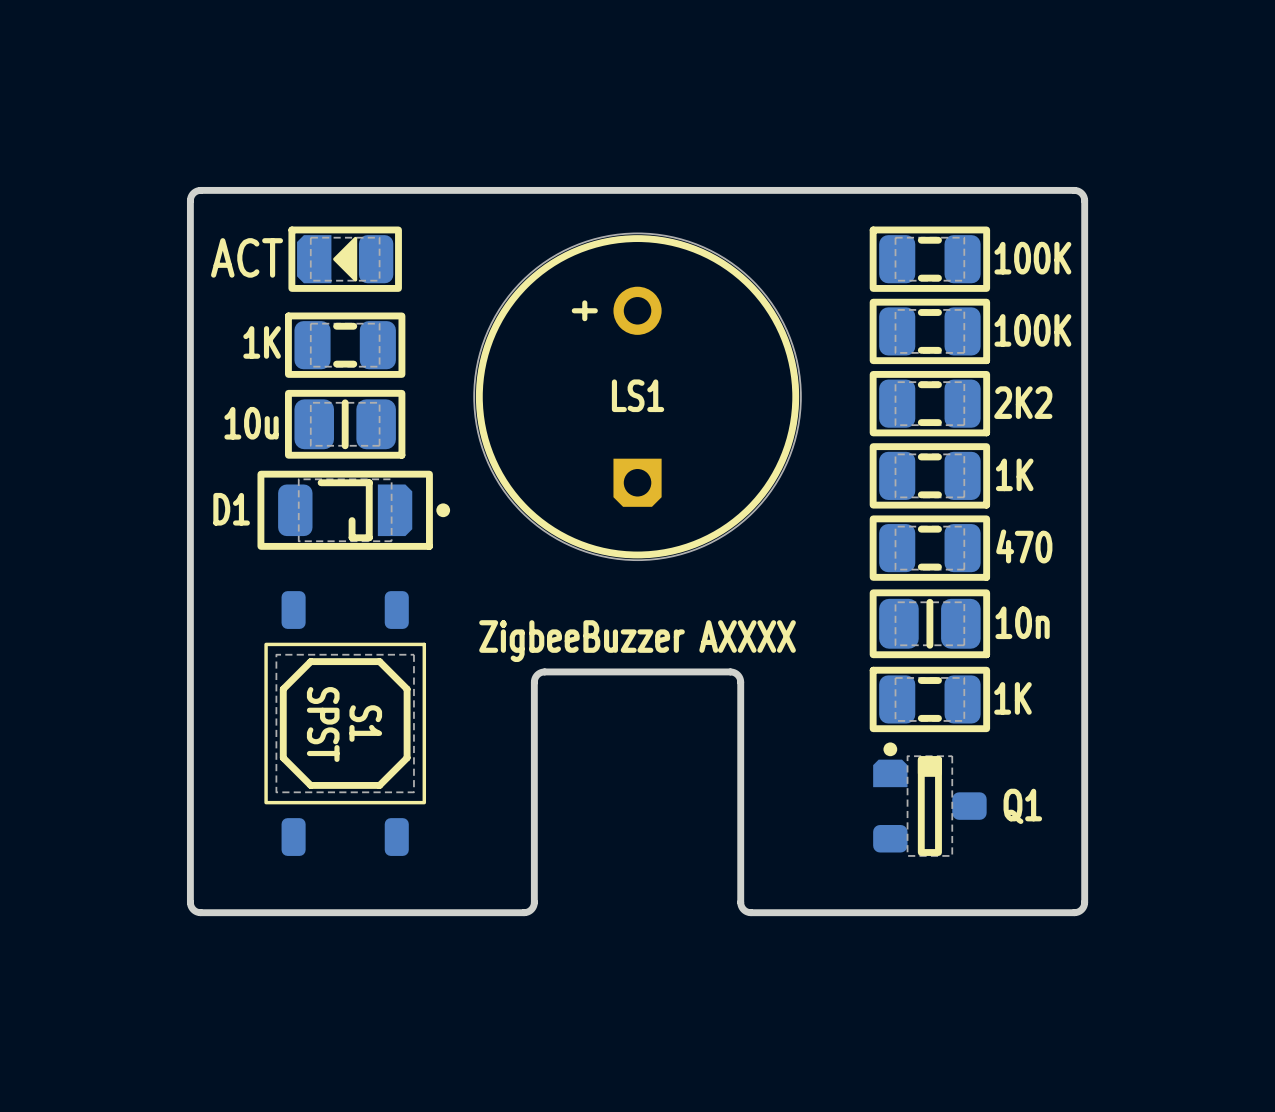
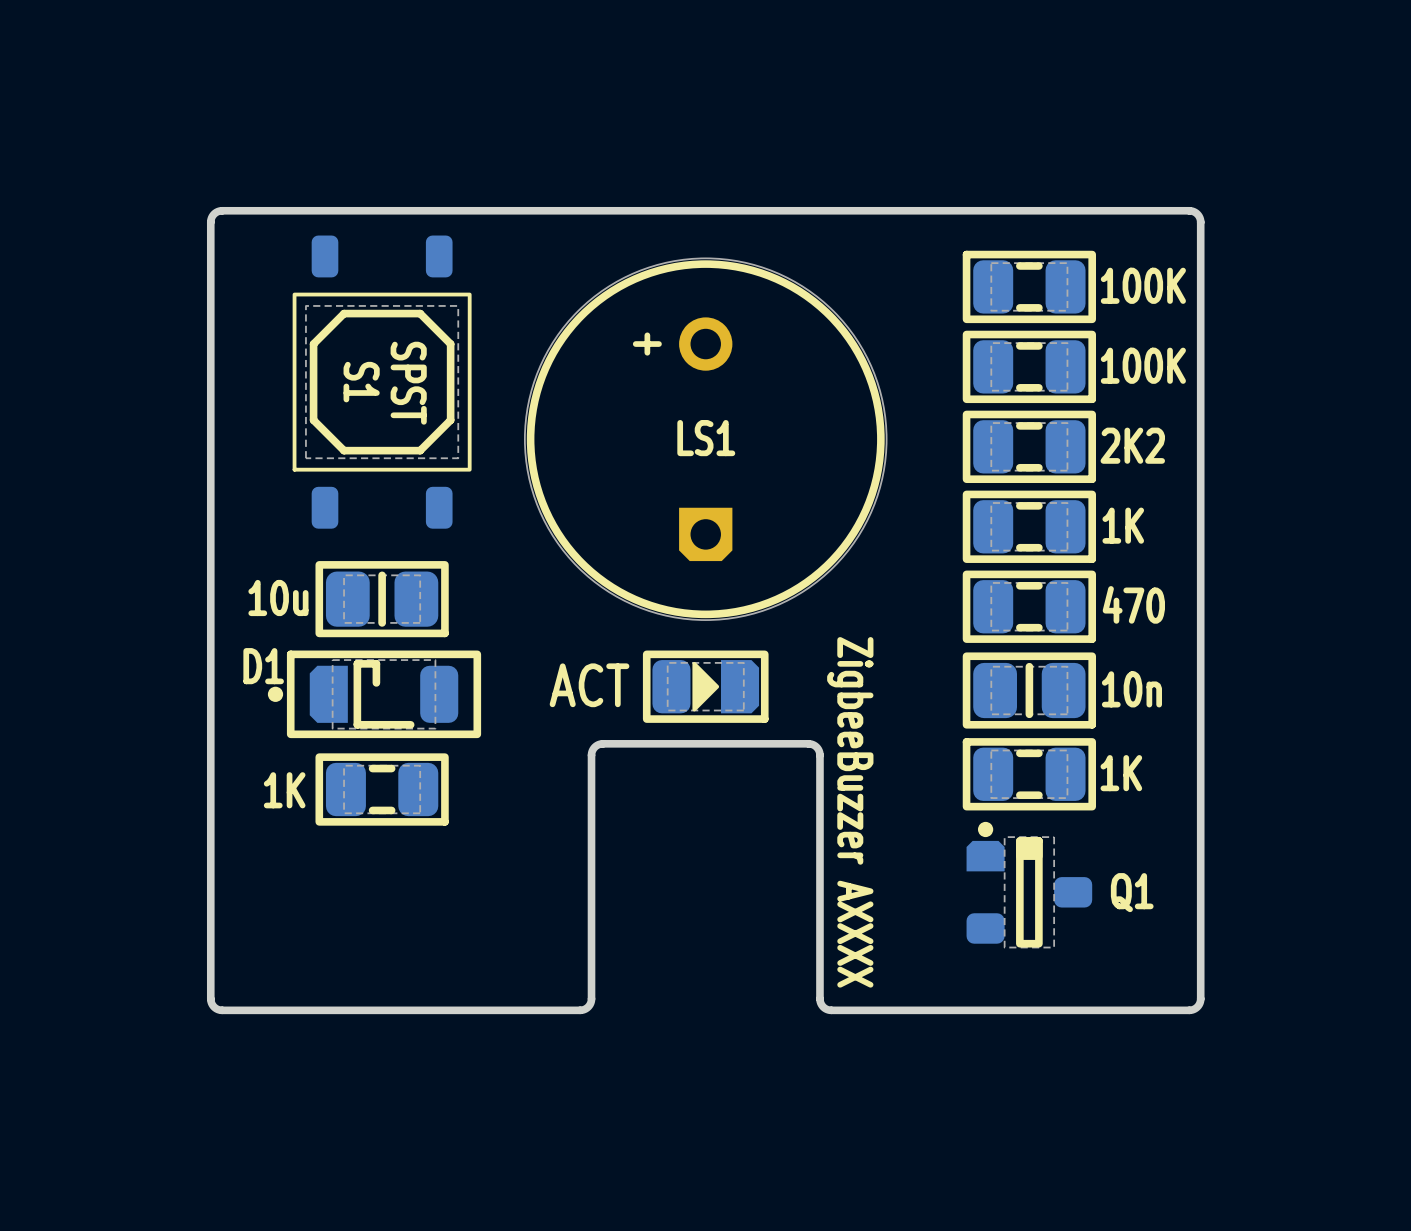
part rotation: 0° (345, 259) -> 180° (705, 686)
part position: (345, 259) -> (705, 686)
part value position: 1K (262, 342) -> 1K (284, 790)
part position: (345, 345) -> (382, 789)
part position: (345, 424) -> (382, 599)
D1 rotation: 0° (353, 510) -> 180° (374, 694)
D1 position: (353, 510) -> (374, 694)
text rotation: 0° (637, 641) -> 90° clockwise (850, 812)
S1 position: (345, 723) -> (382, 382)
S1 name position: S1 (365, 723) -> S1 (361, 382)
S1 value position: SPST (323, 724) -> SPST (408, 383)

